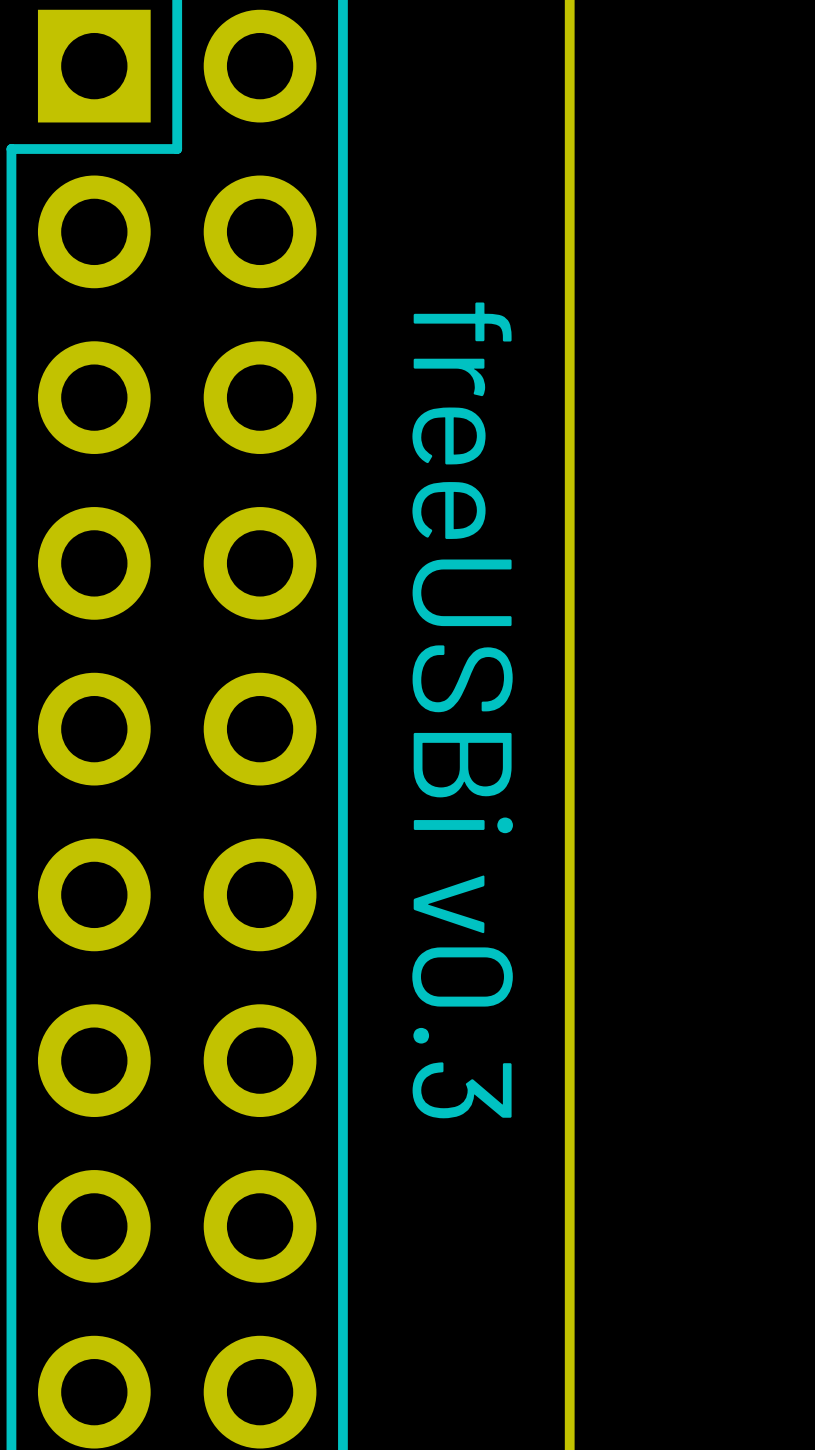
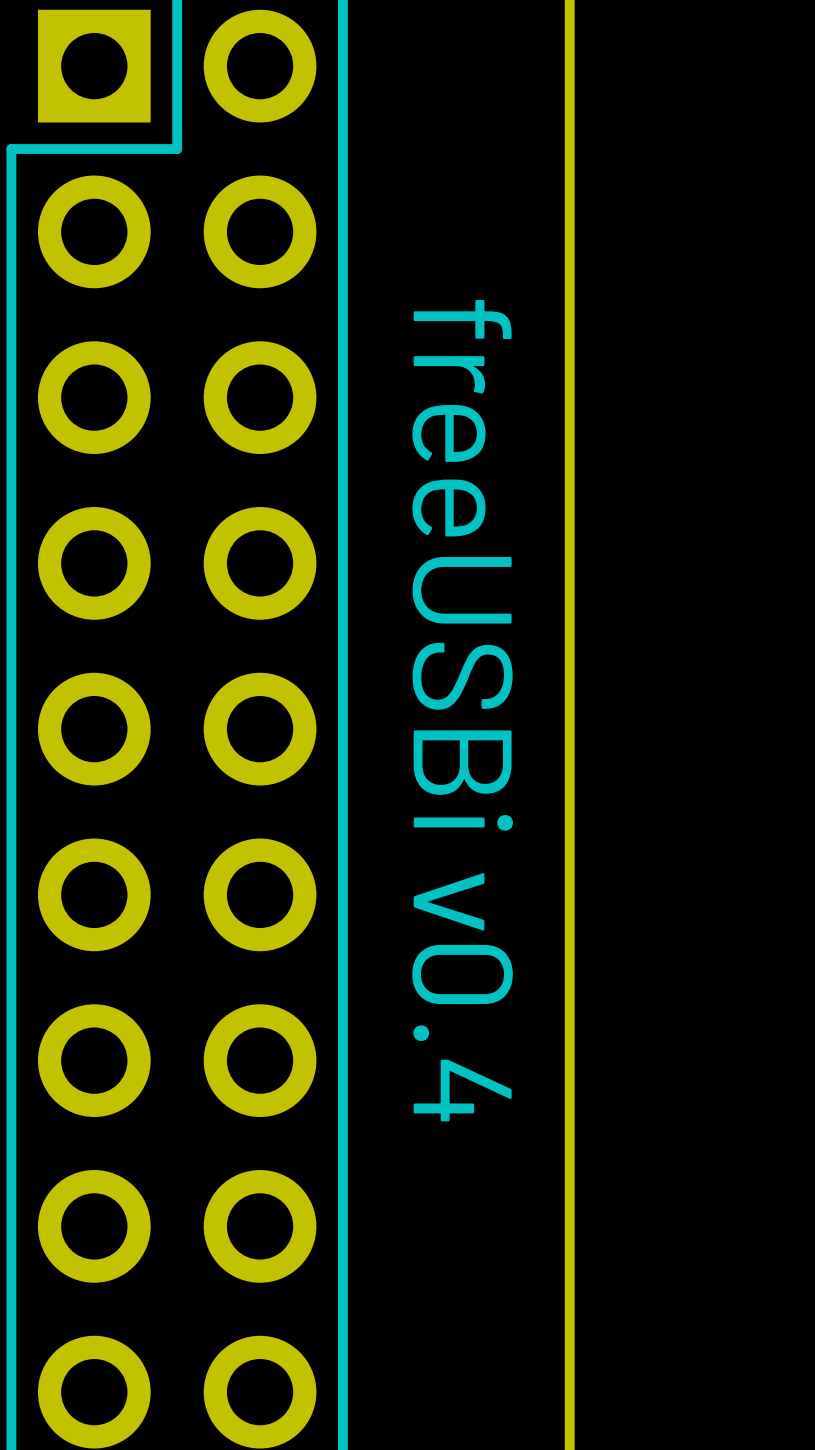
text: freeUSBi v0.3 (462, 710) -> freeUSBi v0.4 (462, 710)

